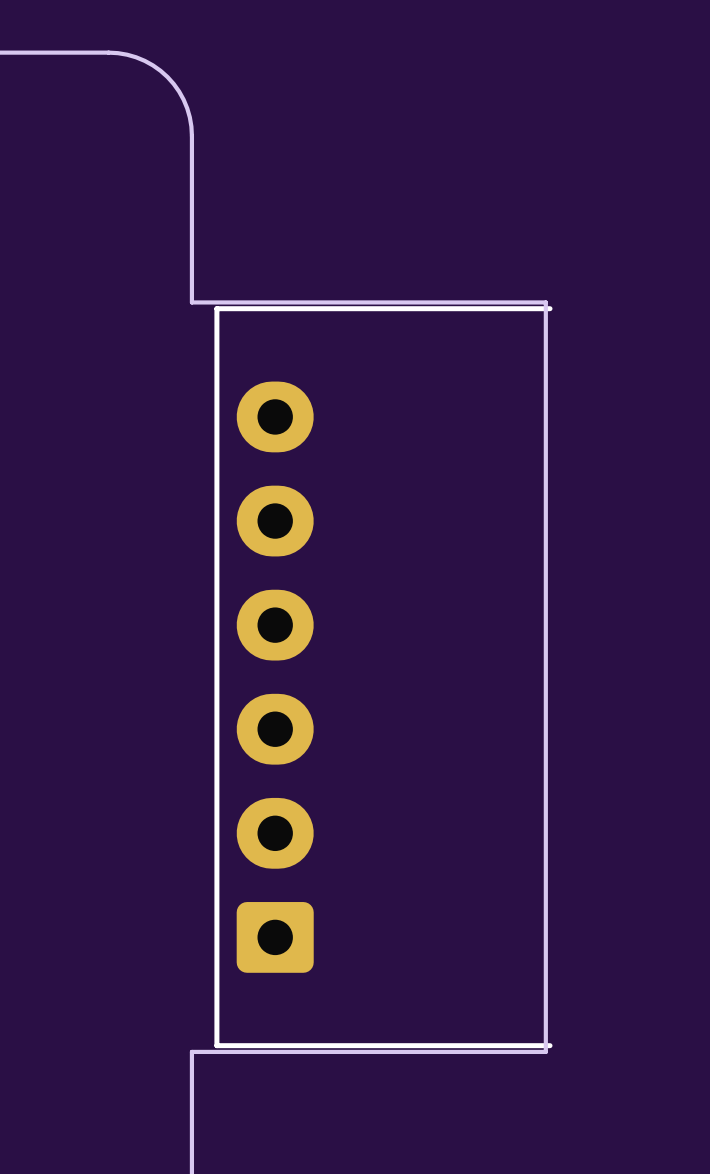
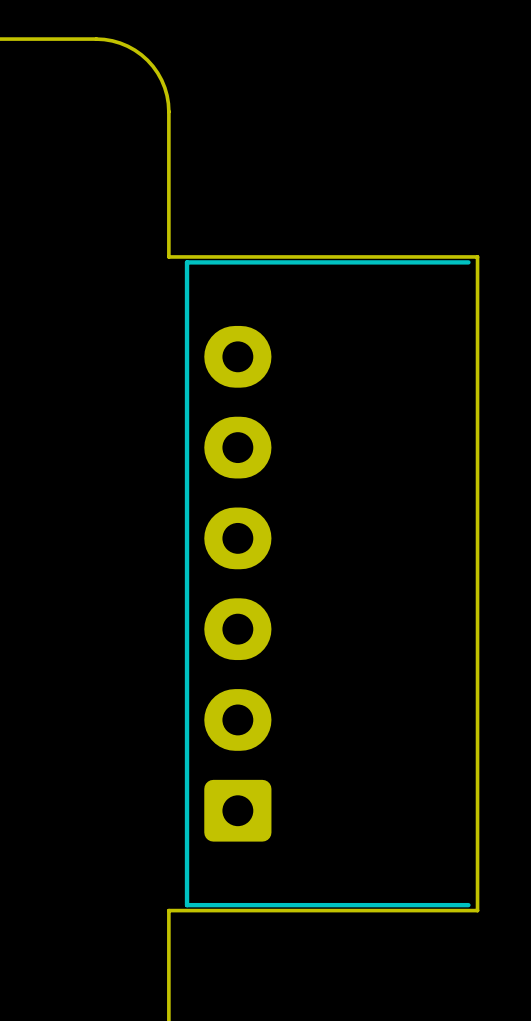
part footprint: [214, 306, 553, 1049] -> [184, 260, 471, 908]

